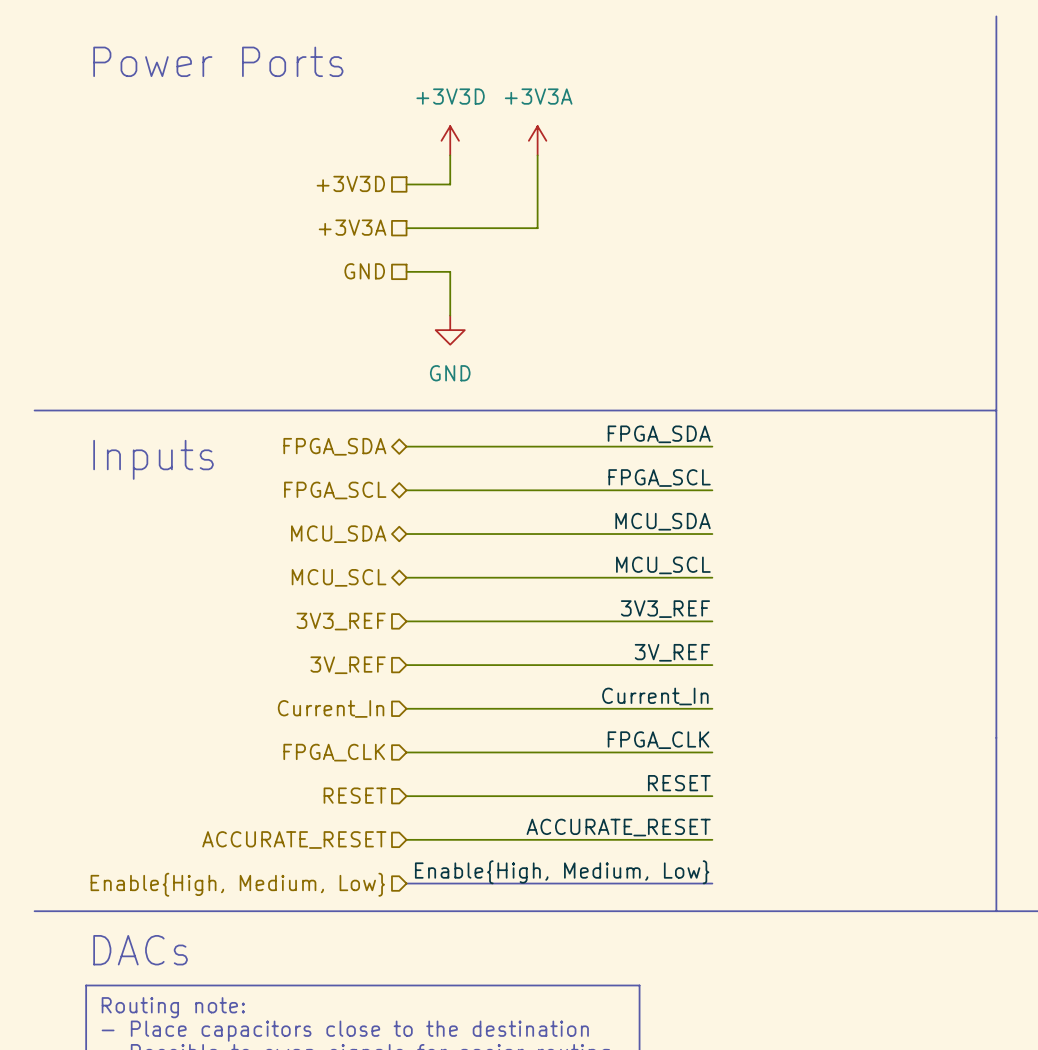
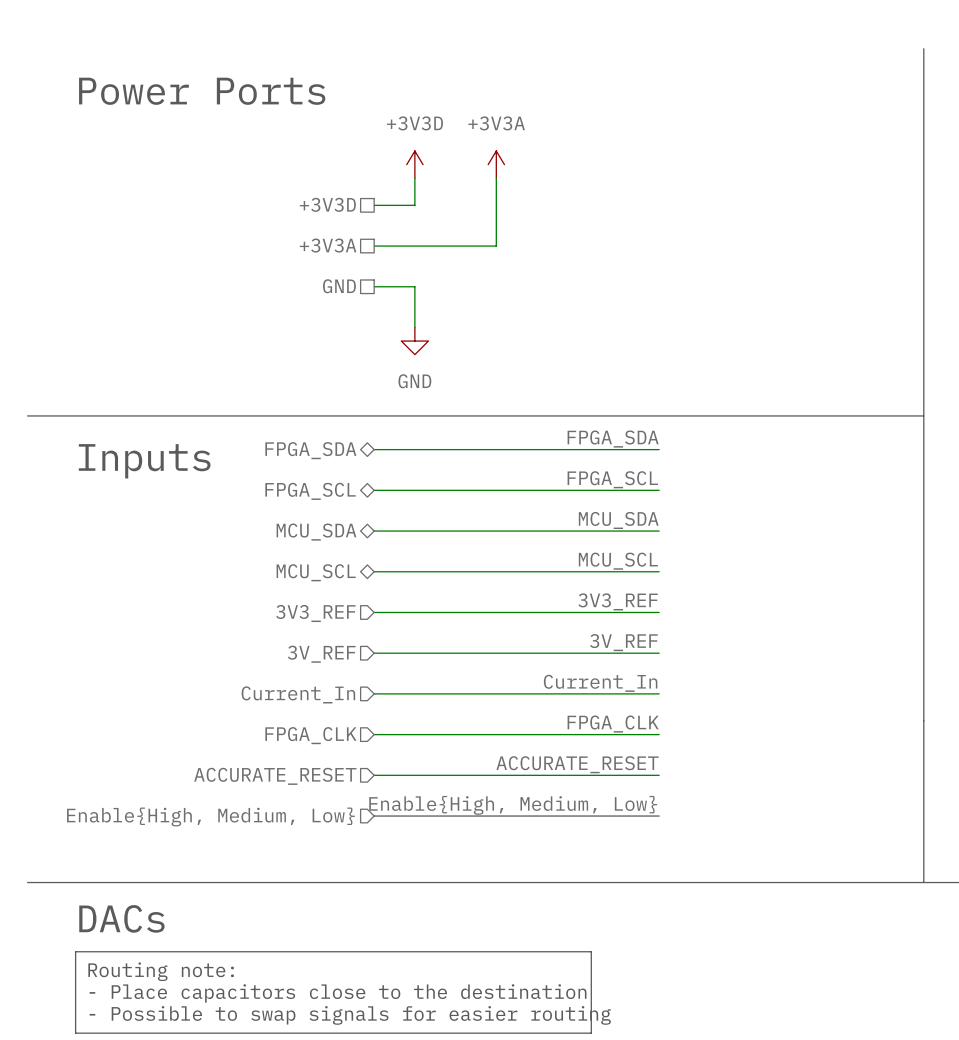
label: RESET (679, 783) -> ACCURATE_RESET (577, 764)
hierarchical label: RESET (354, 795) -> ACCURATE_RESET (275, 776)
label: ACCURATE_RESET (618, 827) -> Enable{High, Medium, Low} (513, 805)
hierarchical label: ACCURATE_RESET (294, 840) -> Enable{High, Medium, Low} (210, 816)
label: Enable{High, Medium, Low} (562, 872) -> none
bus: (406, 883) (712, 883) -> (374, 816) (659, 816)
hierarchical label: Enable{High, Medium, Low} (237, 884) -> none

